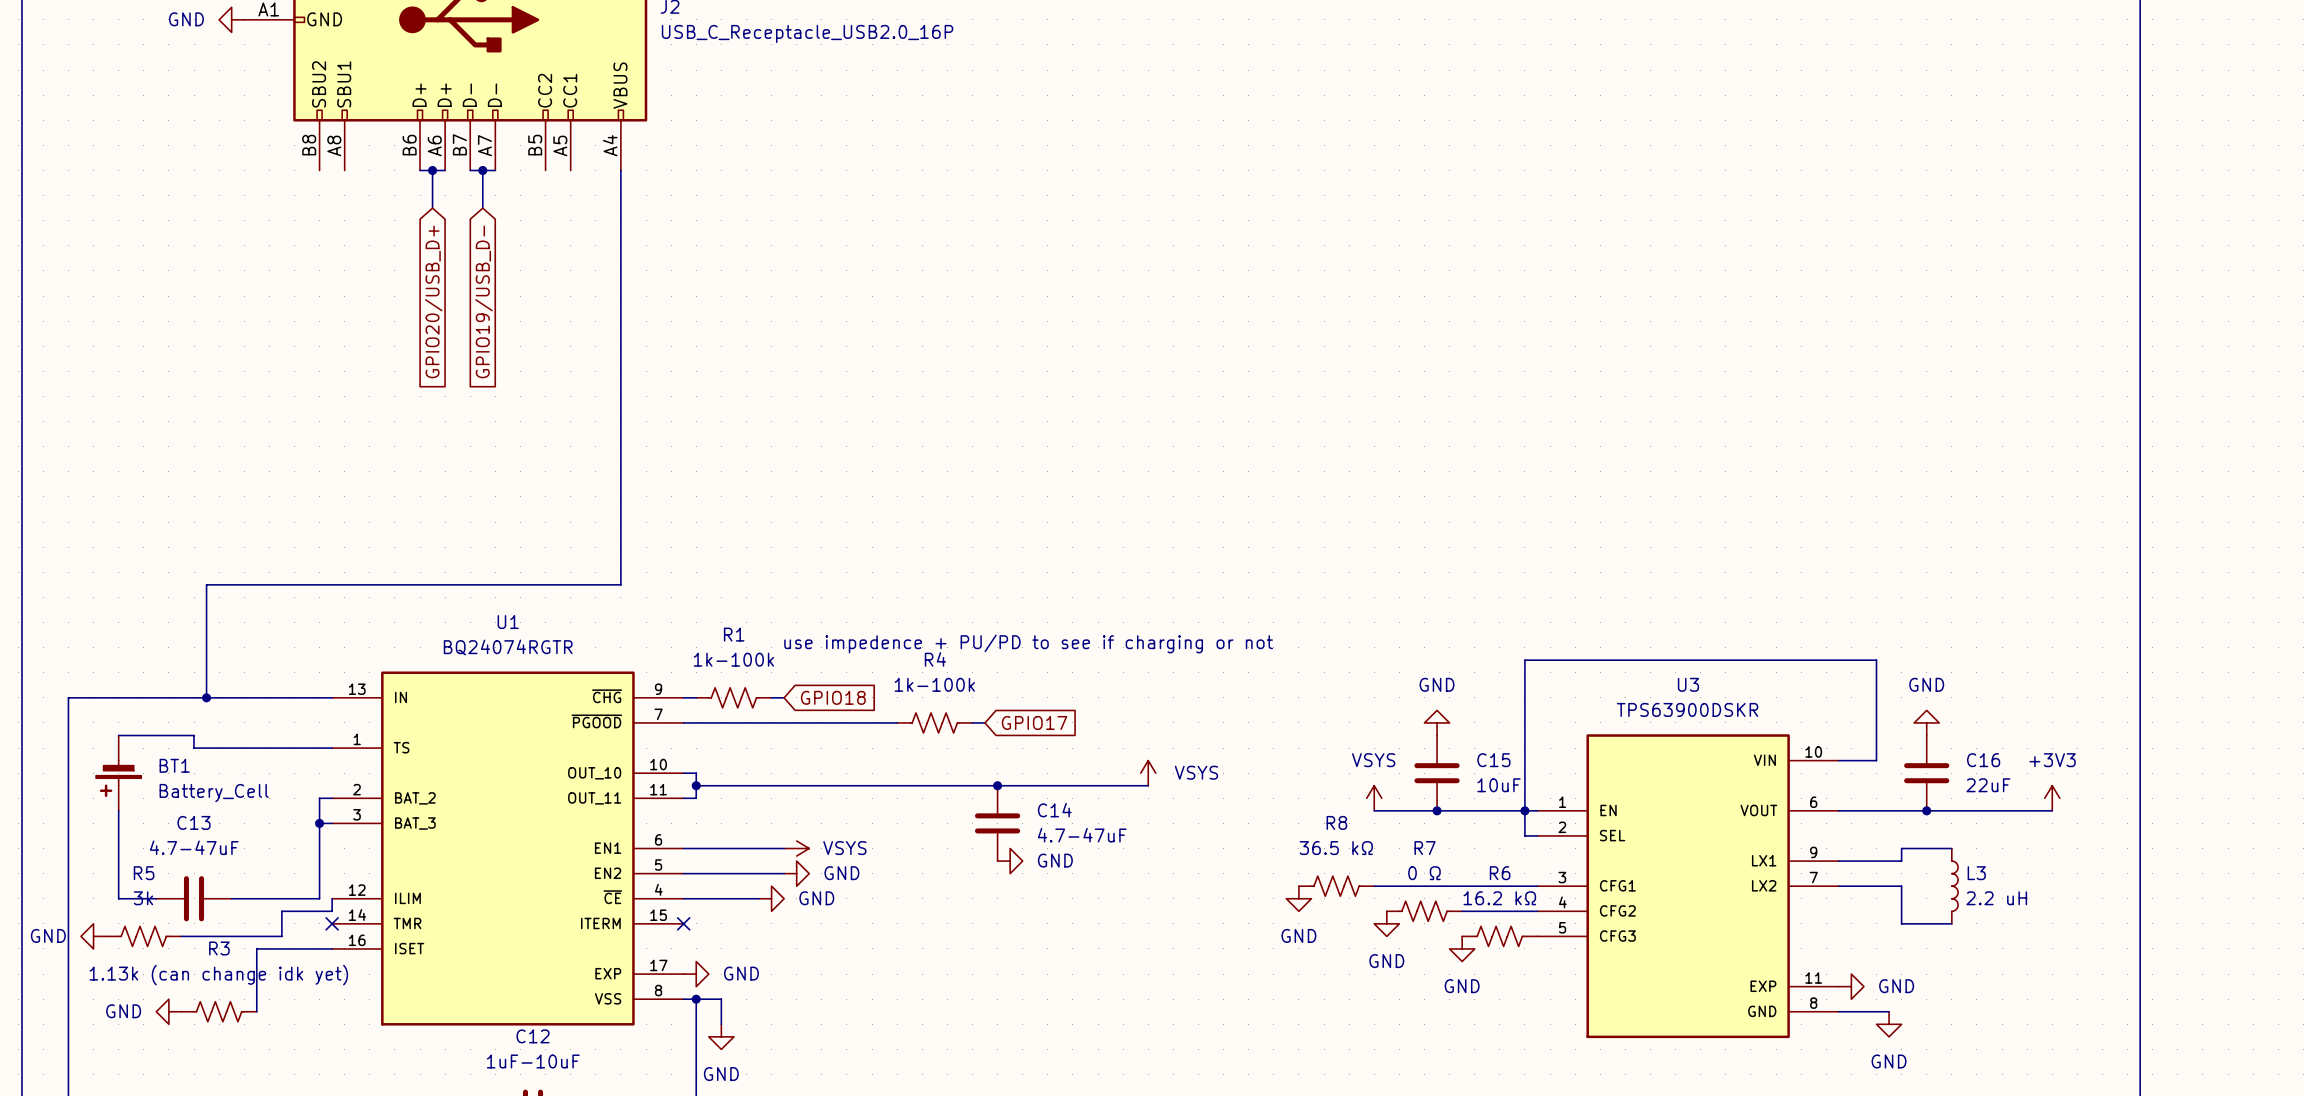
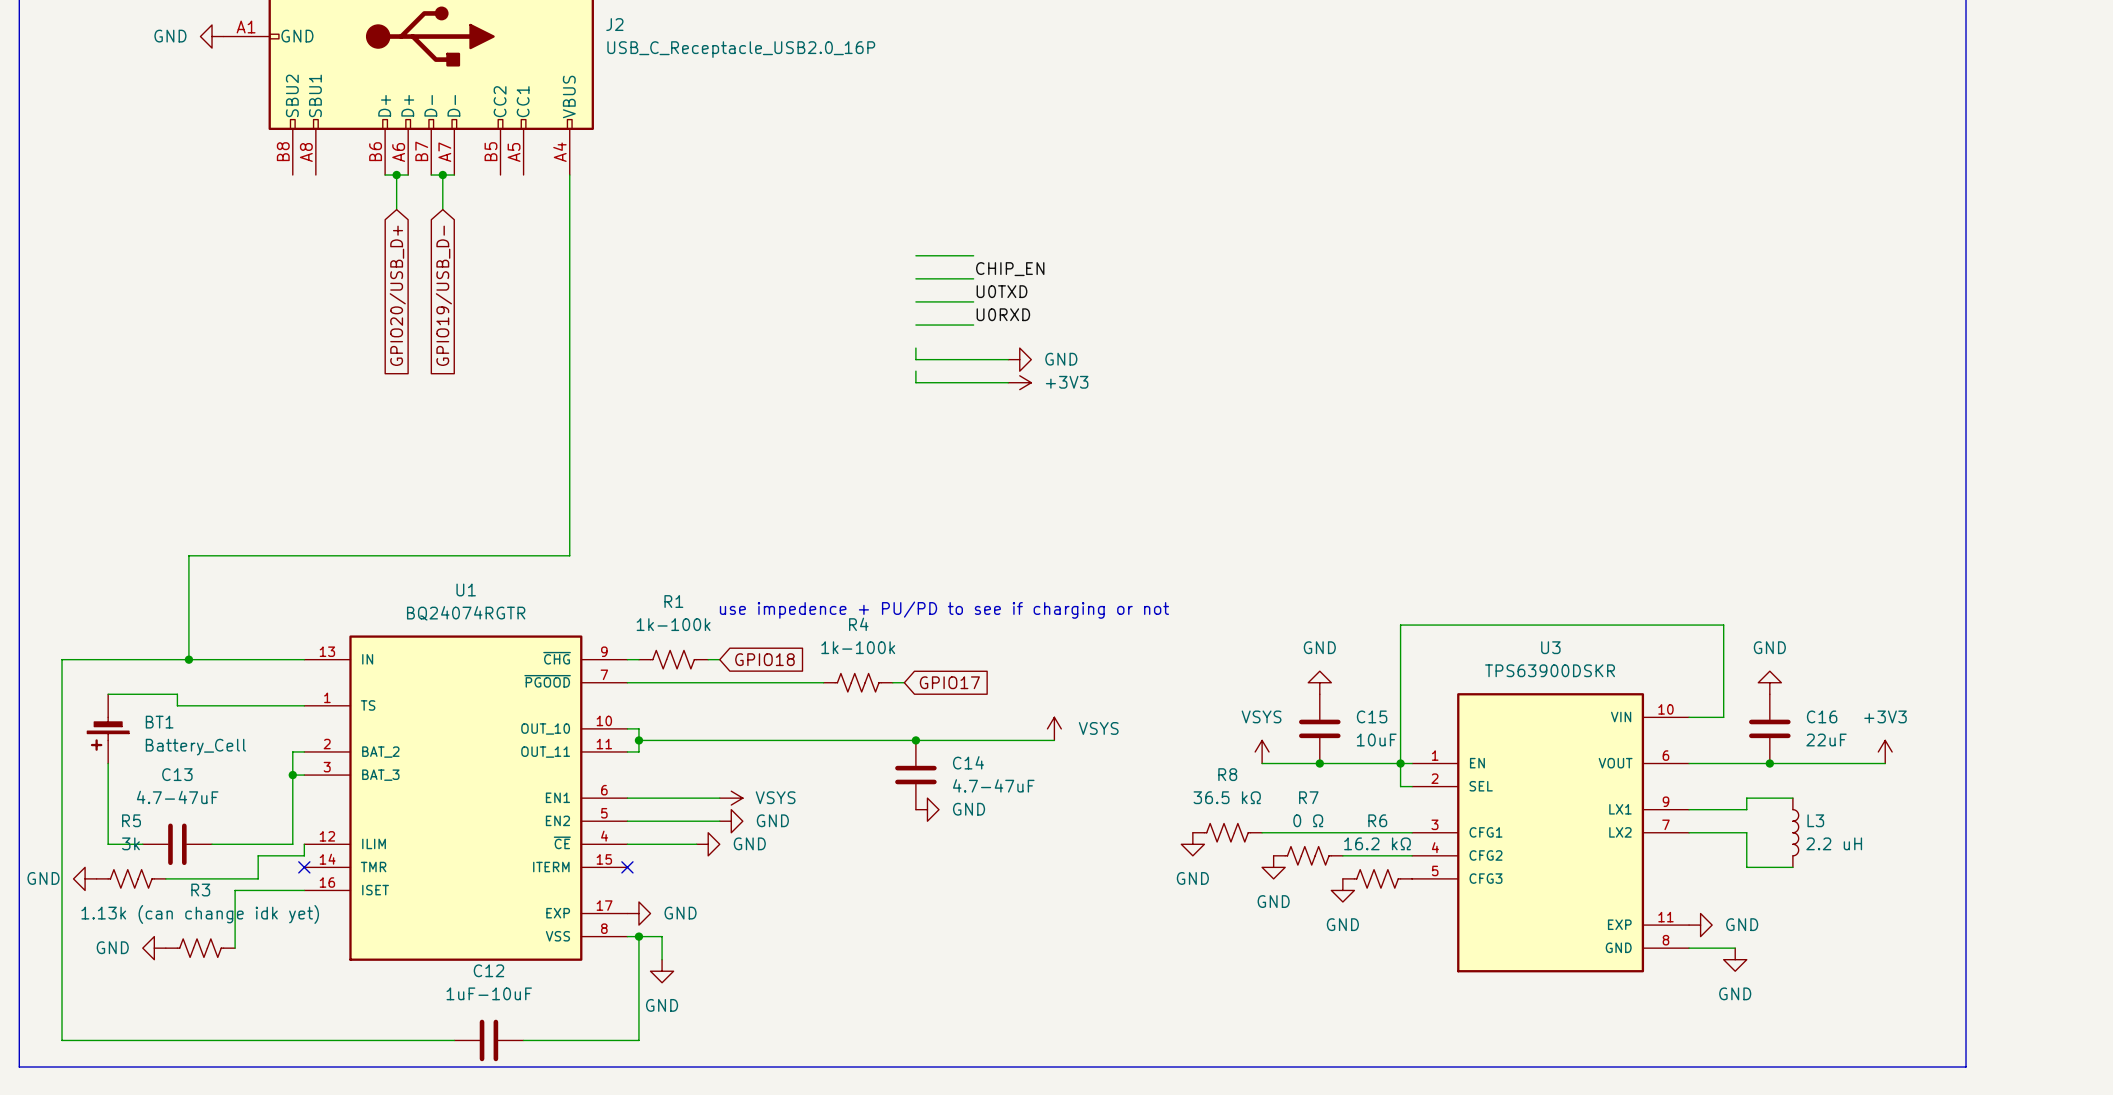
wire: none -> (915, 255) (973, 255)
label: none -> CHIP_EN (1010, 269)
wire: none -> (915, 278) (973, 278)
label: none -> U0TXD (1002, 291)
wire: none -> (915, 301) (973, 301)
label: none -> U0RXD (1003, 314)
wire: none -> (915, 325) (973, 325)
wire: none -> (915, 348) (915, 359) (1008, 359)
power symbol: none -> GND (1019, 359)
wire: none -> (915, 371) (915, 382) (1008, 382)
power symbol: none -> +3V3 (1019, 382)

